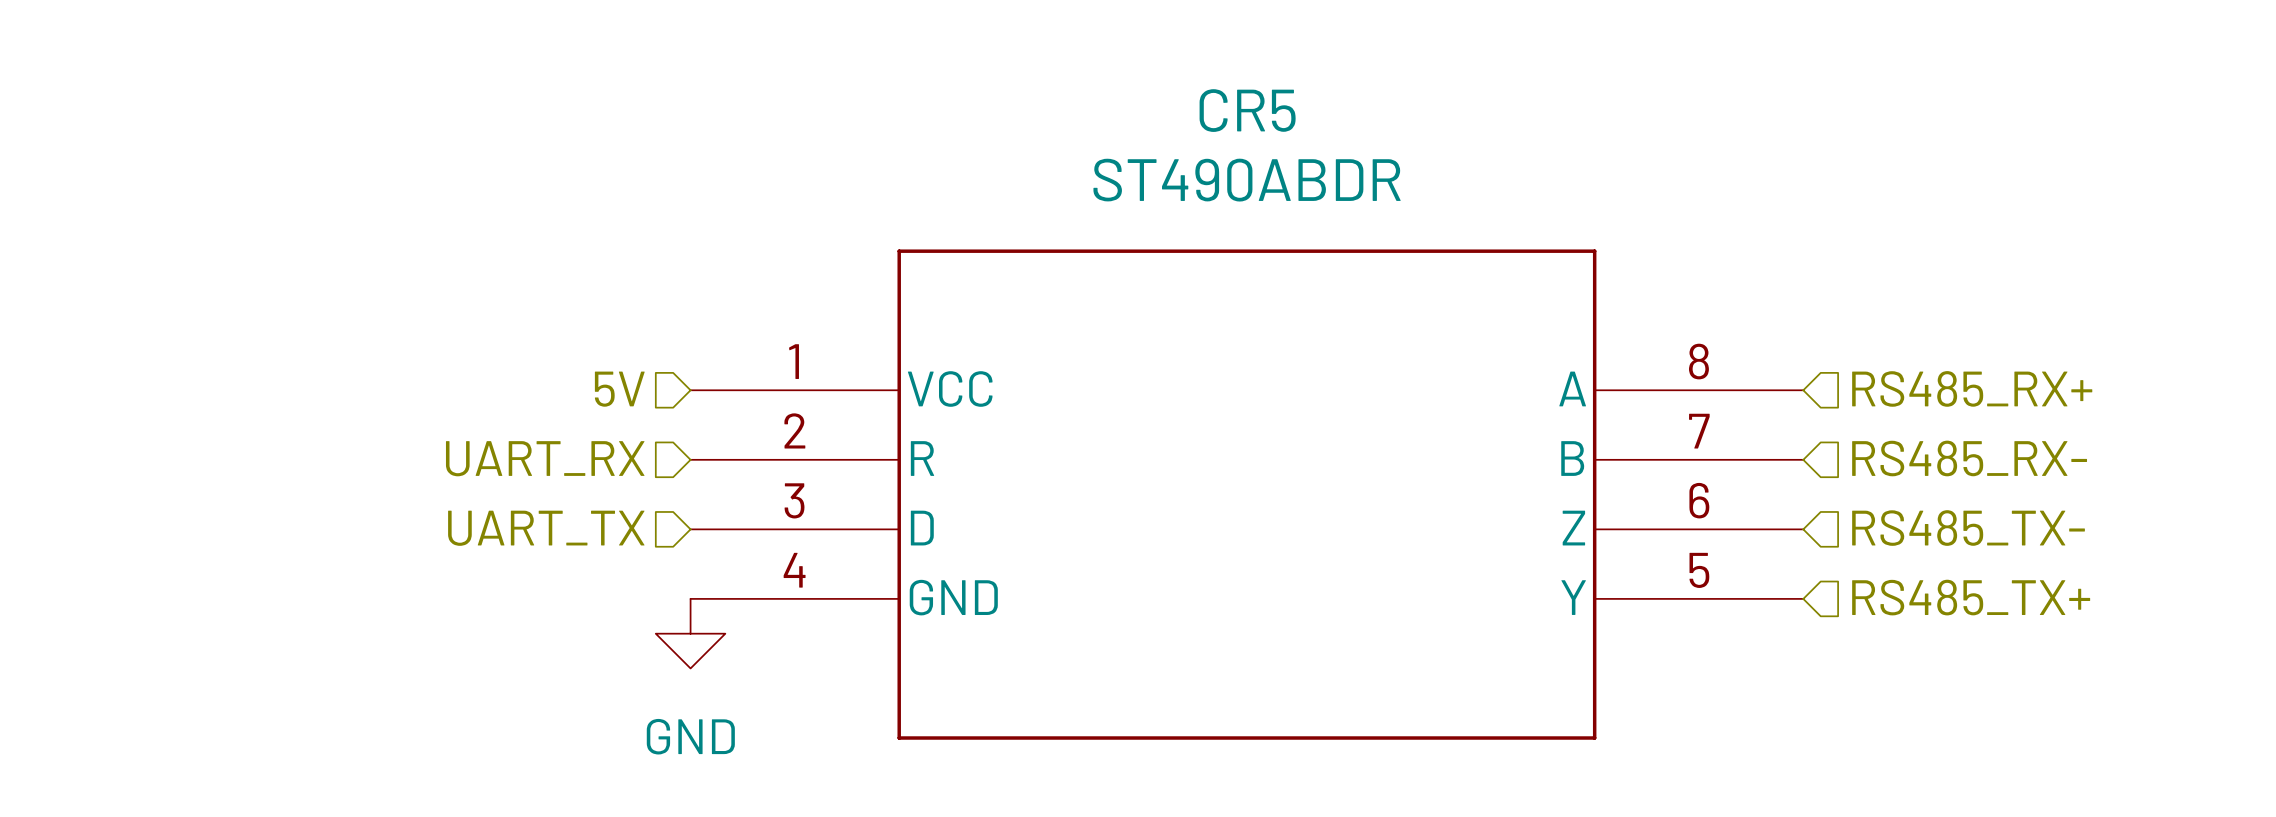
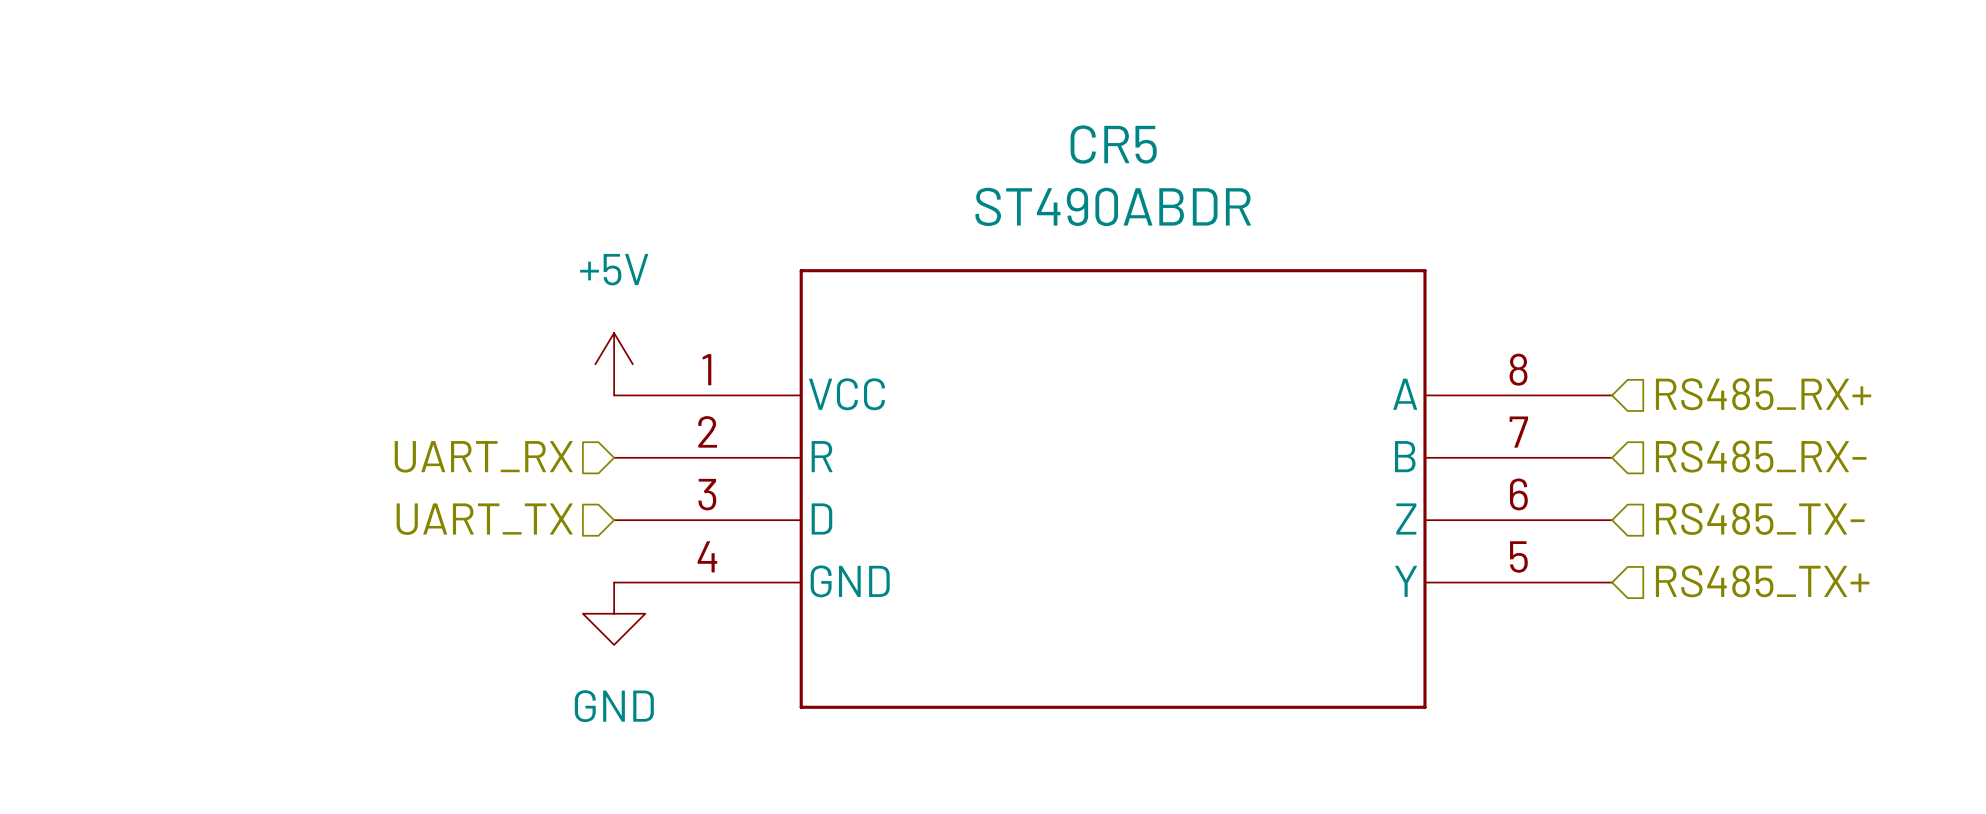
power symbol: none -> +5V (614, 364)
hierarchical label: 5V (619, 389) -> none

